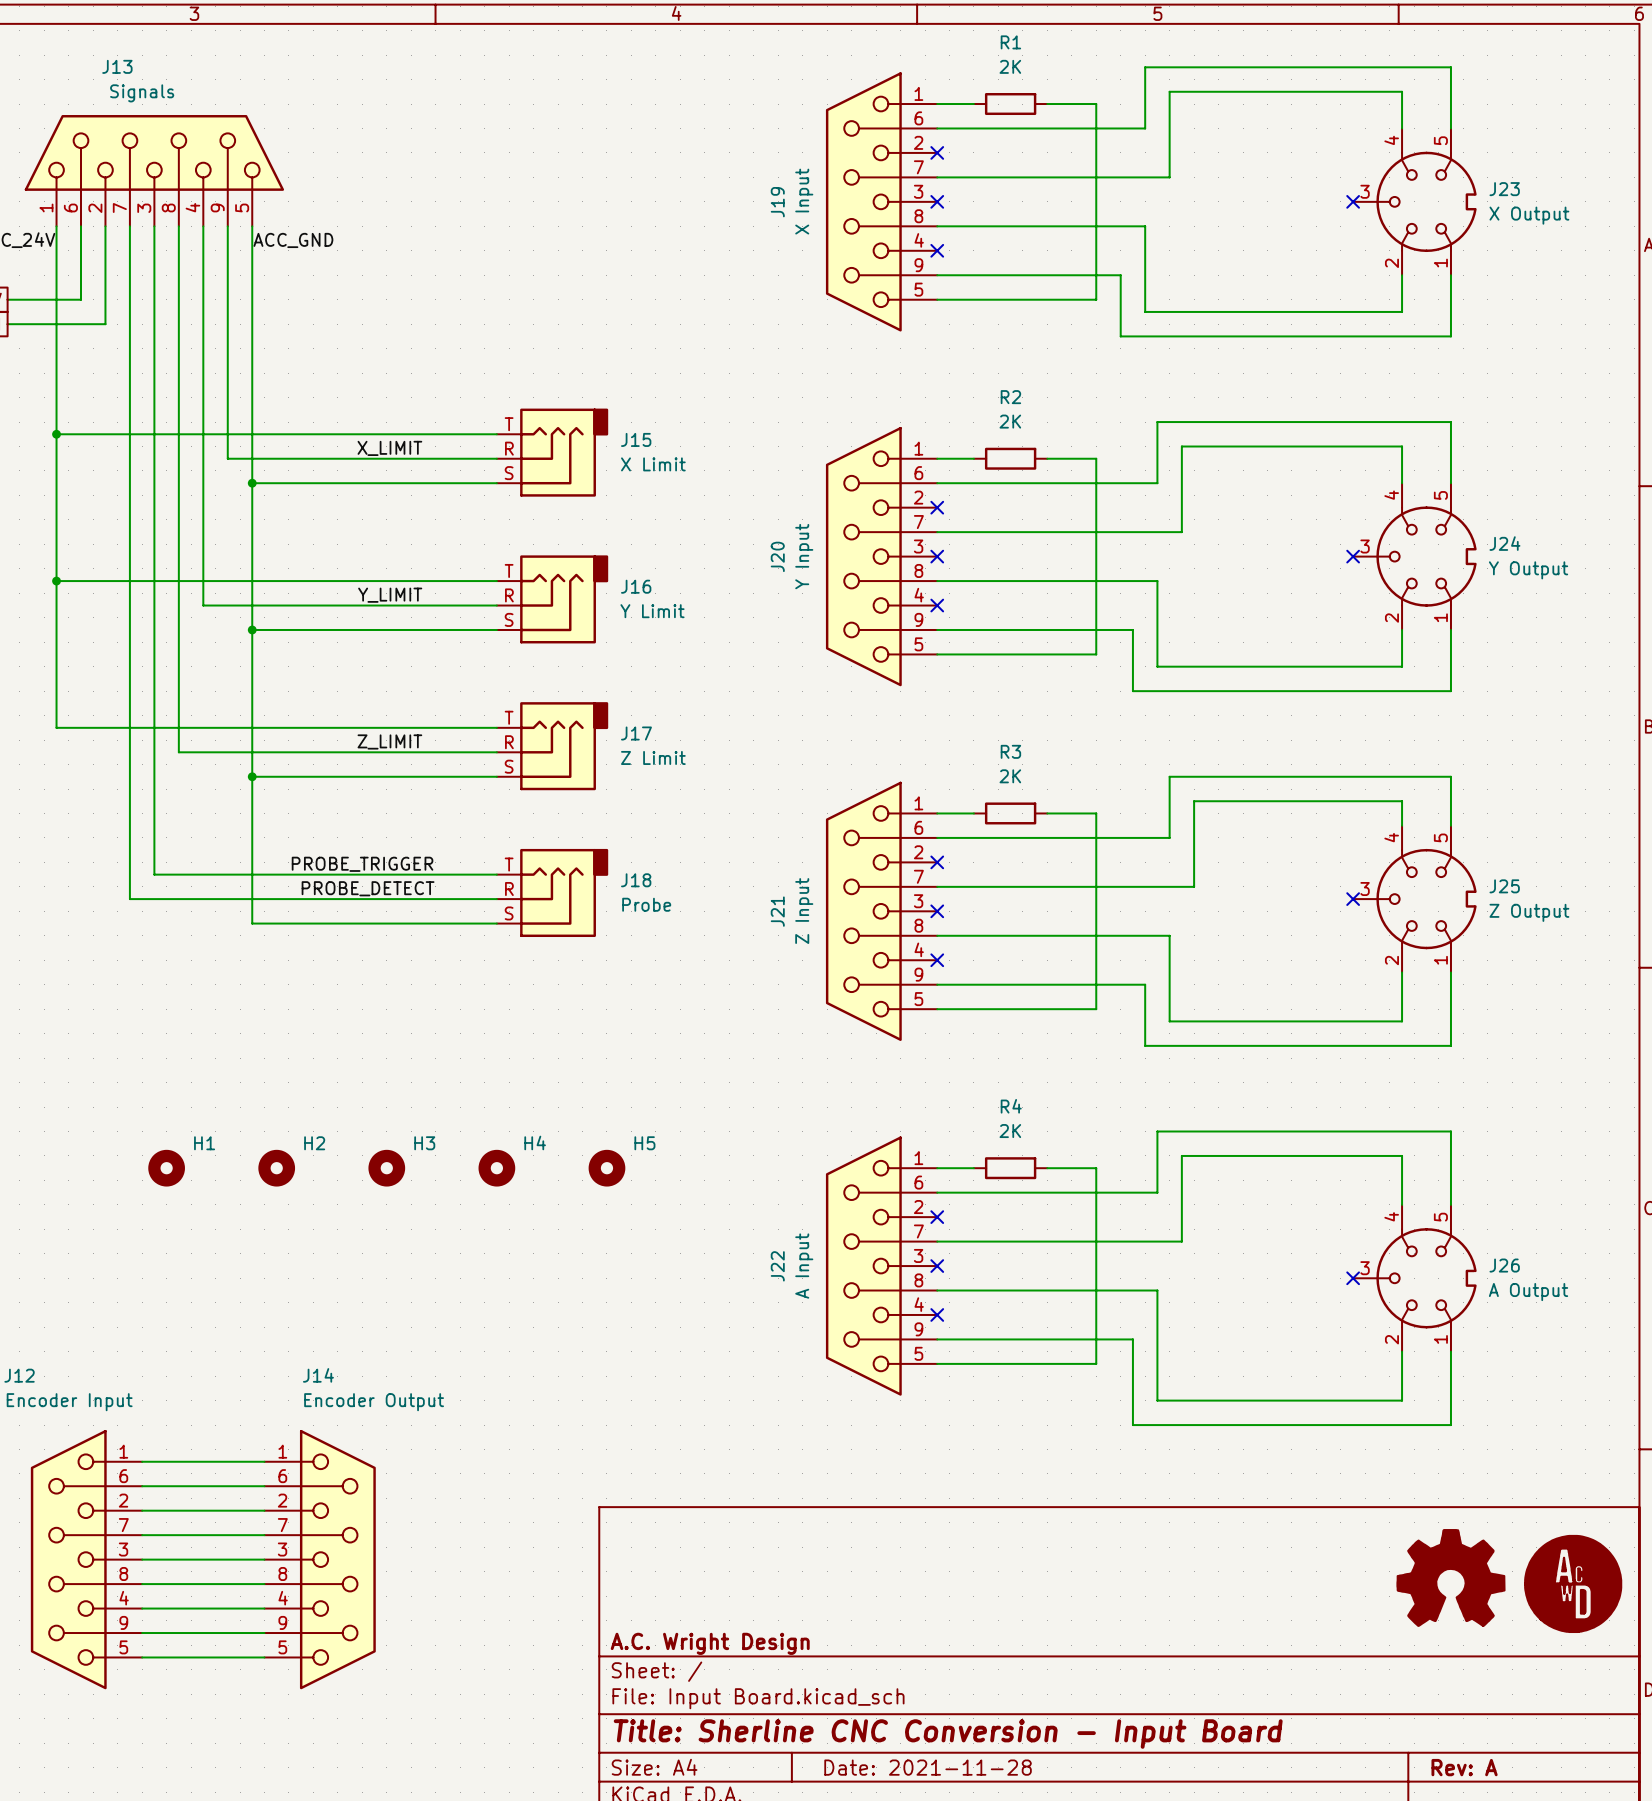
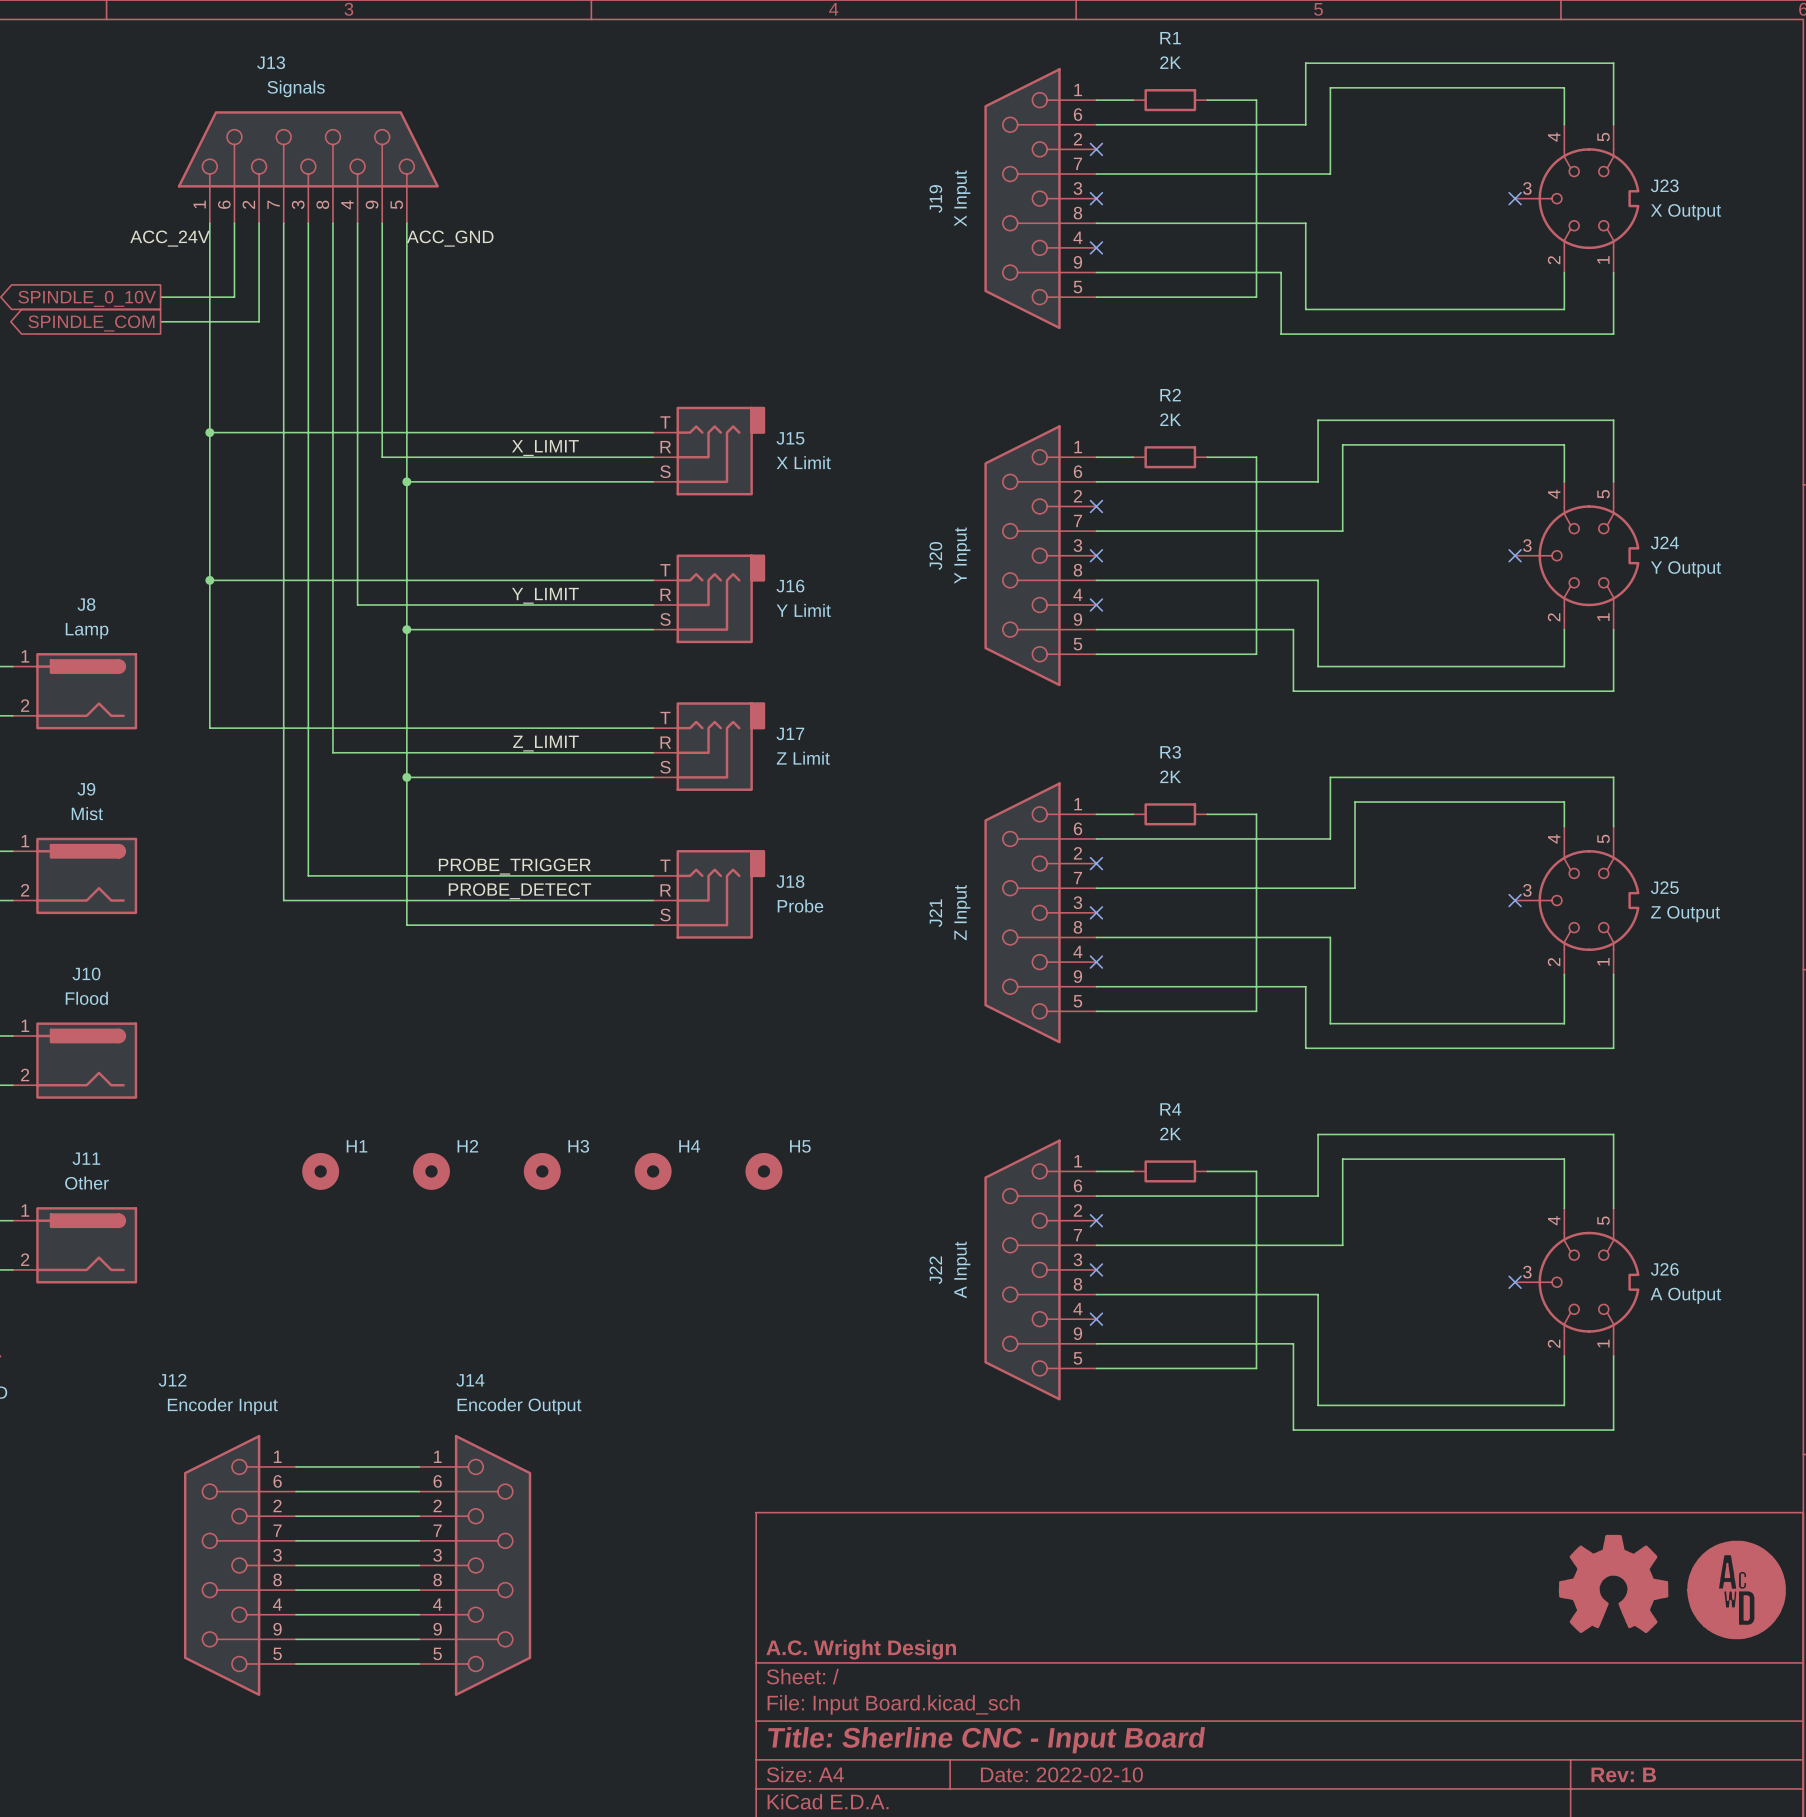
title block: Title: Sherline CNC Conversion - Input Board (948, 1734) -> Title: Sherline CNC - Input Board (986, 1740)
title block: Date: 2021-11-28 (928, 1767) -> Date: 2022-02-10 (1061, 1774)
title block: Rev: A (1464, 1767) -> Rev: B (1623, 1774)

